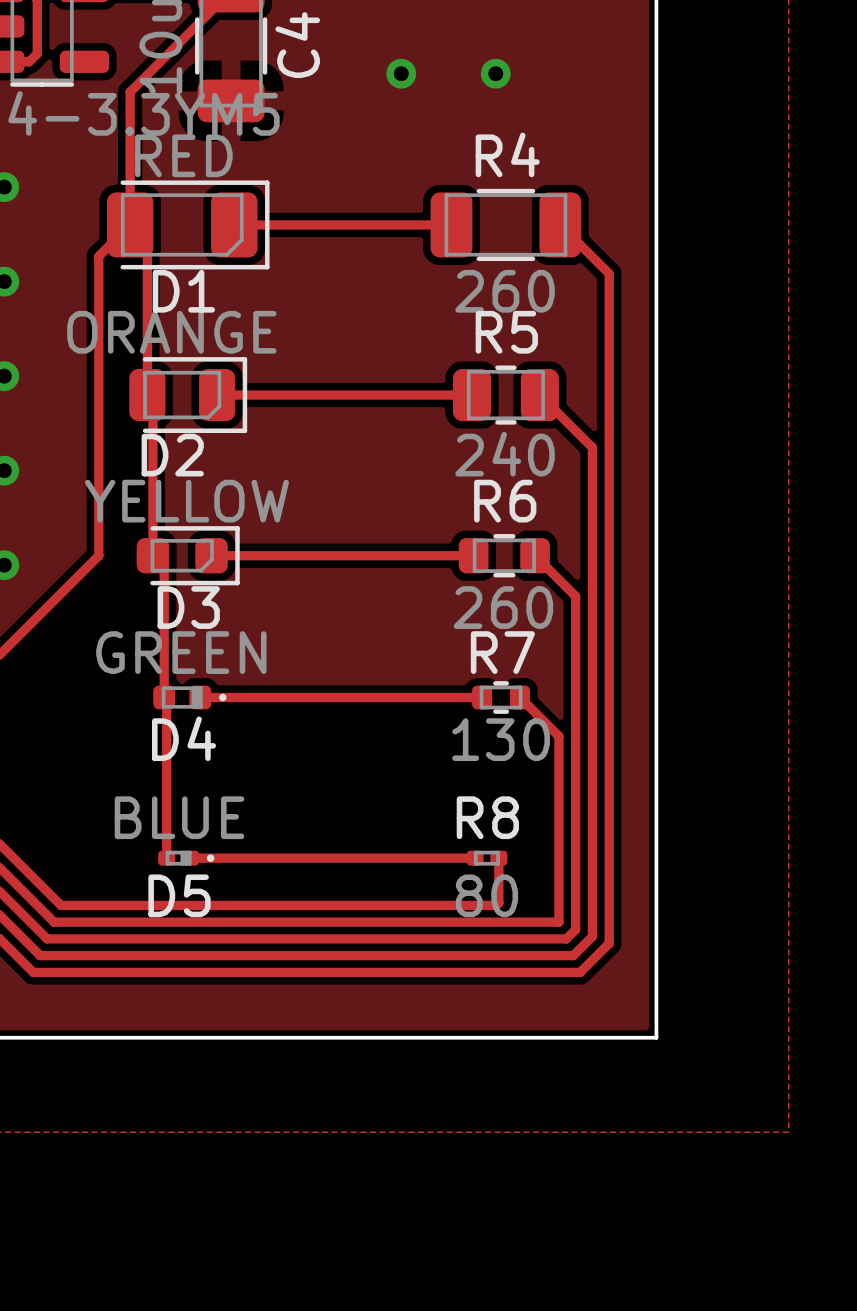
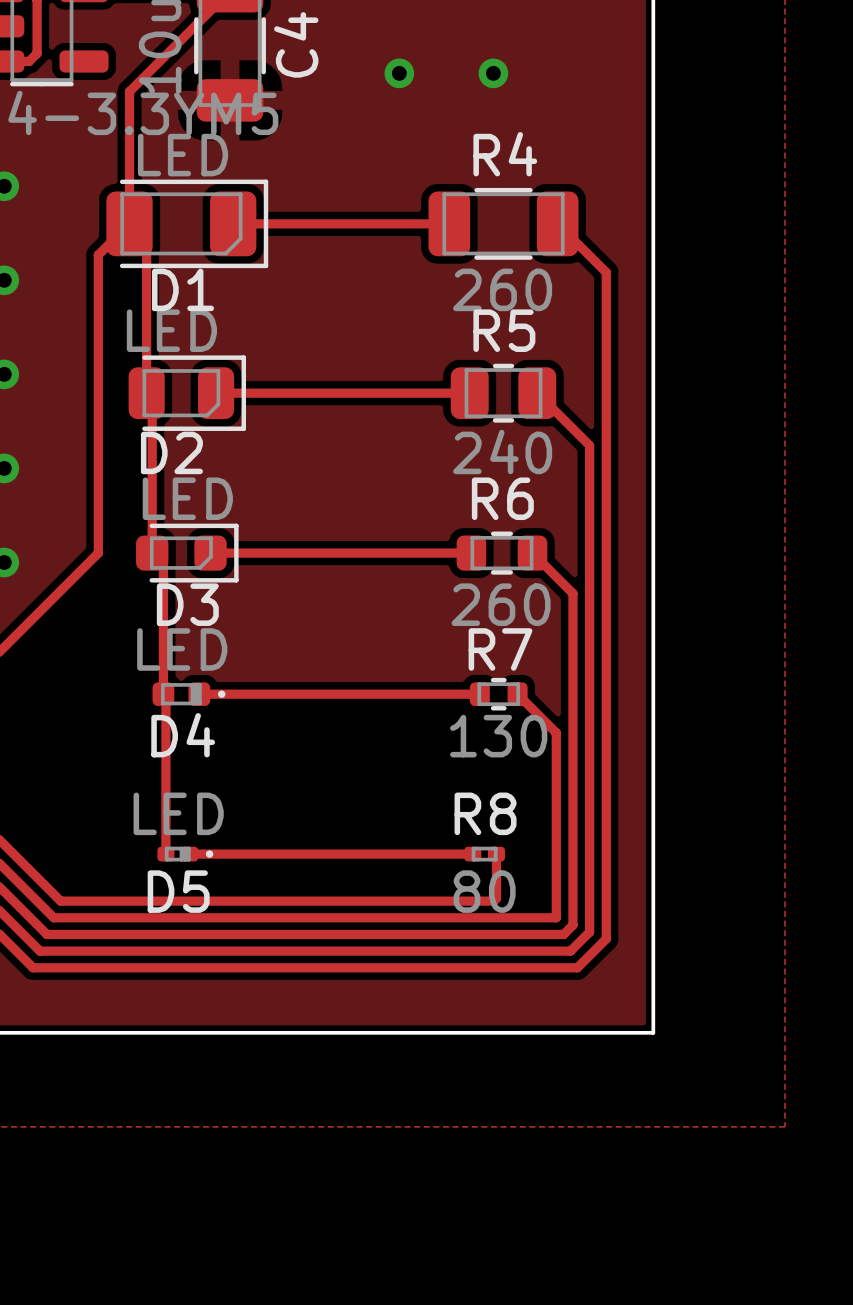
D1 value: RED (183, 155) -> LED (183, 155)
D2 value: ORANGE (171, 332) -> LED (171, 330)
D3 value: YELLOW (186, 501) -> LED (187, 498)
D4 value: GREEN (181, 652) -> LED (182, 649)
D5 value: BLUE (179, 817) -> LED (178, 813)

